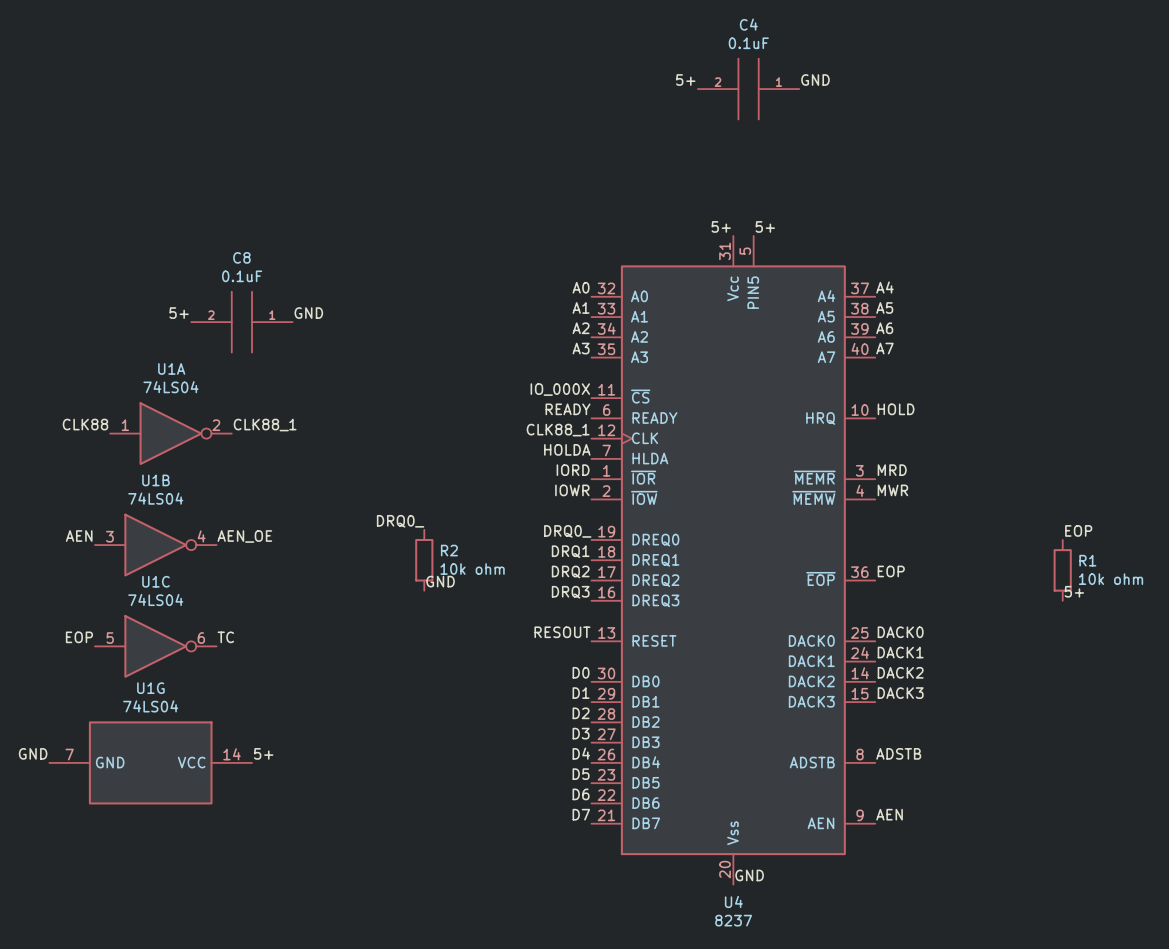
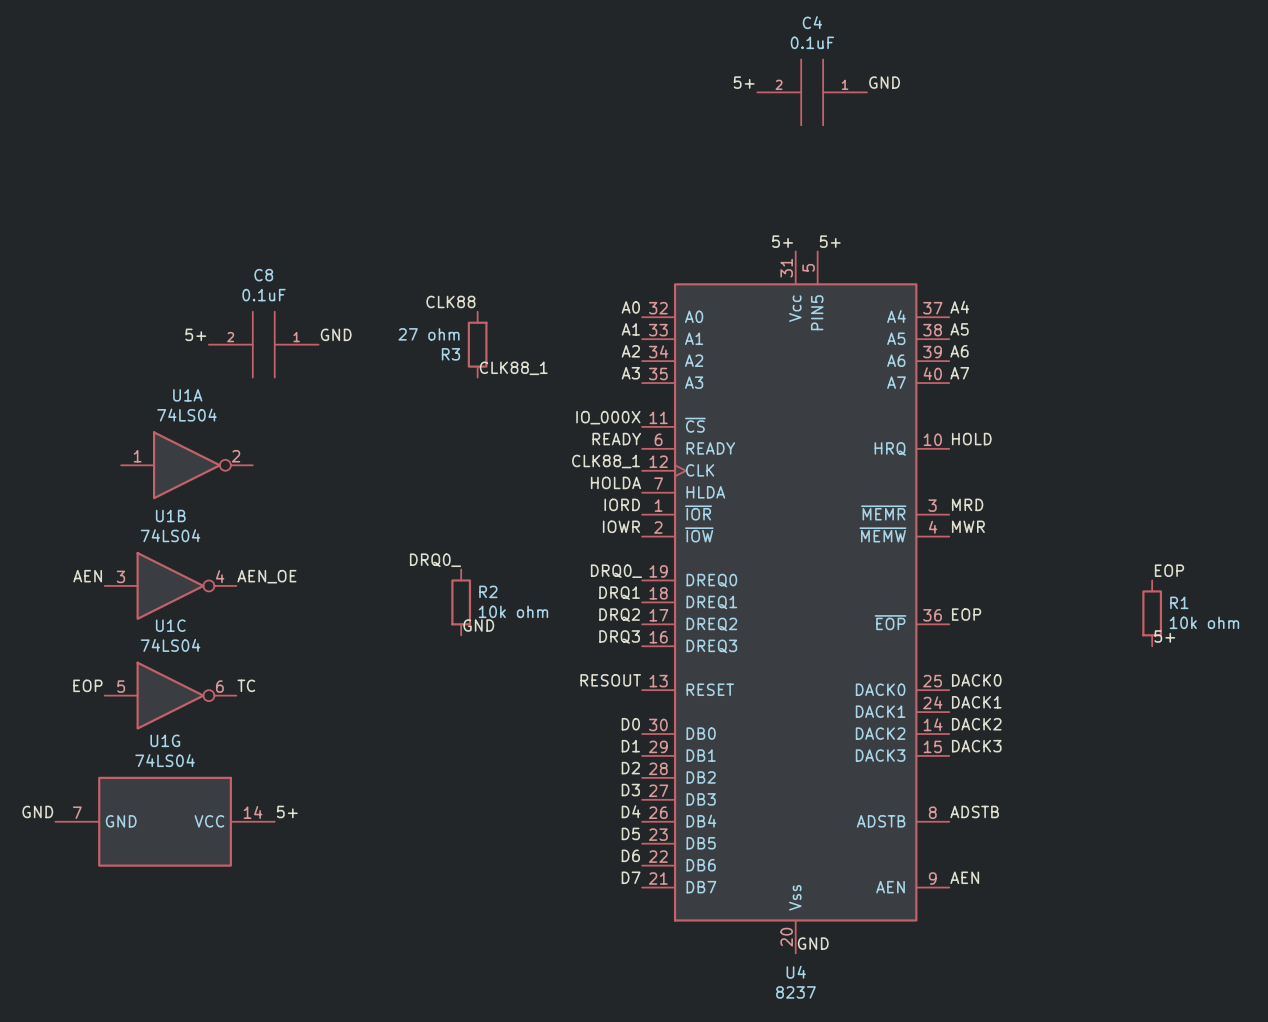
label: none -> CLK88 (450, 301)
R3: none -> 27 ohm (477, 344)
label: none -> CLK88_1 (513, 368)
label: CLK88 (85, 424) -> none
label: CLK88_1 (265, 425) -> none

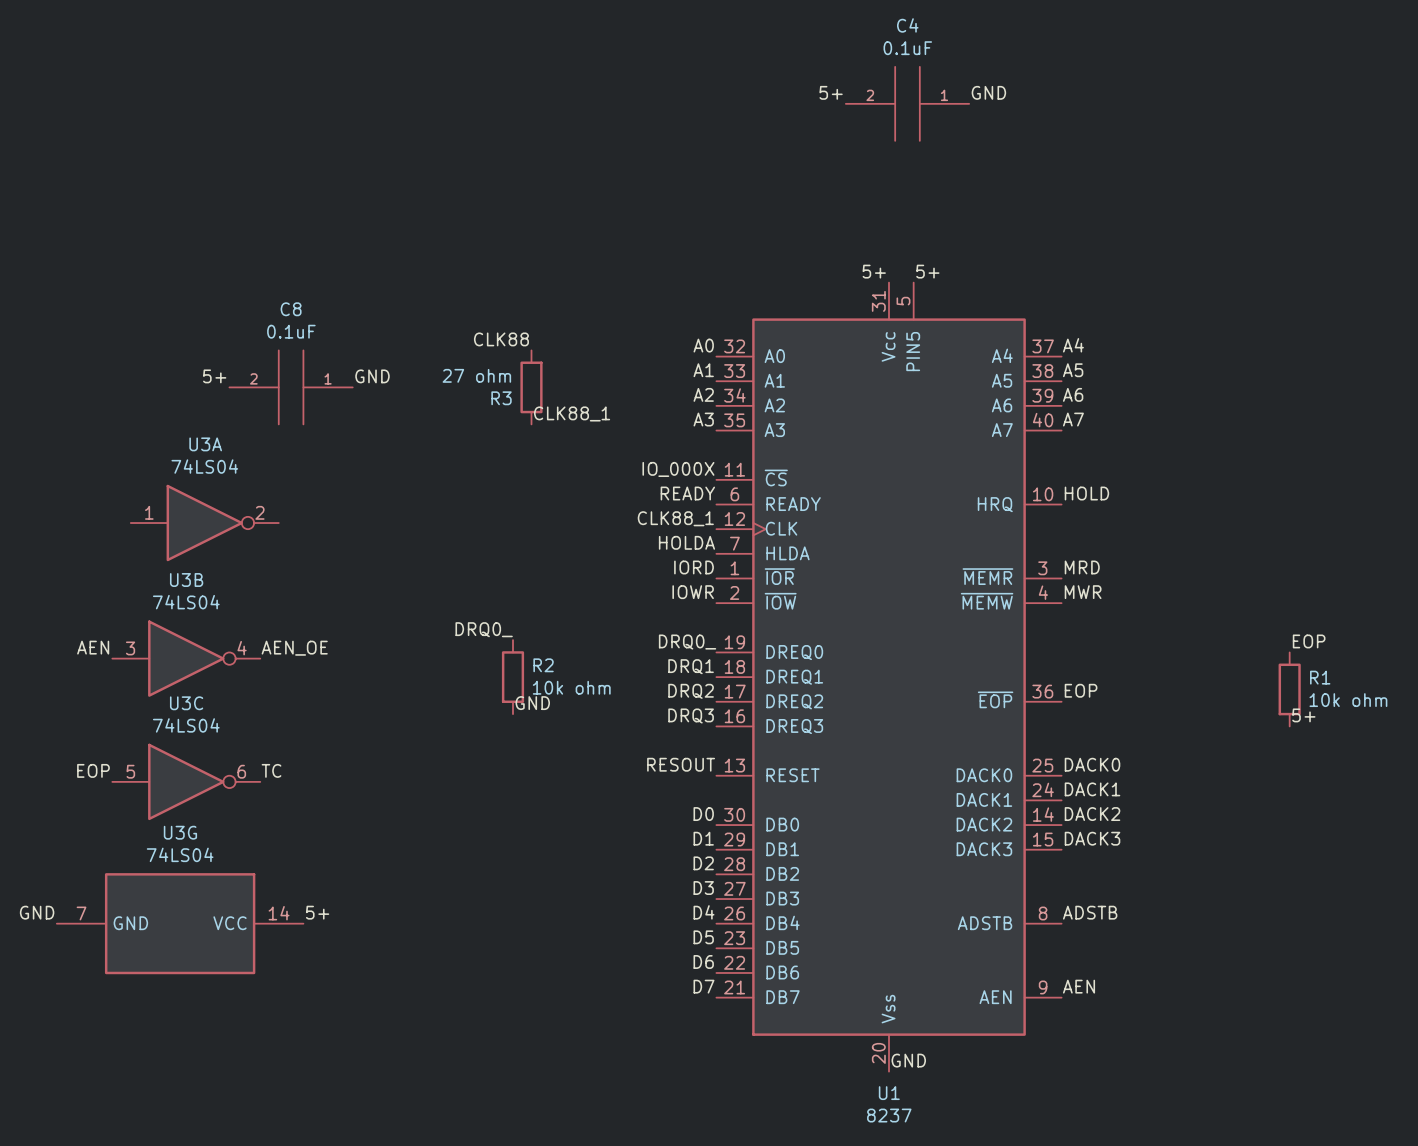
U1A name: U1A (187, 395) -> U3A (205, 444)
U1B name: U1B (170, 516) -> U3B (186, 580)
U1C name: U1C (170, 625) -> U3C (186, 703)
U1G name: U1G (165, 740) -> U3G (180, 832)
U4 name: U4 (796, 972) -> U1 (889, 1093)

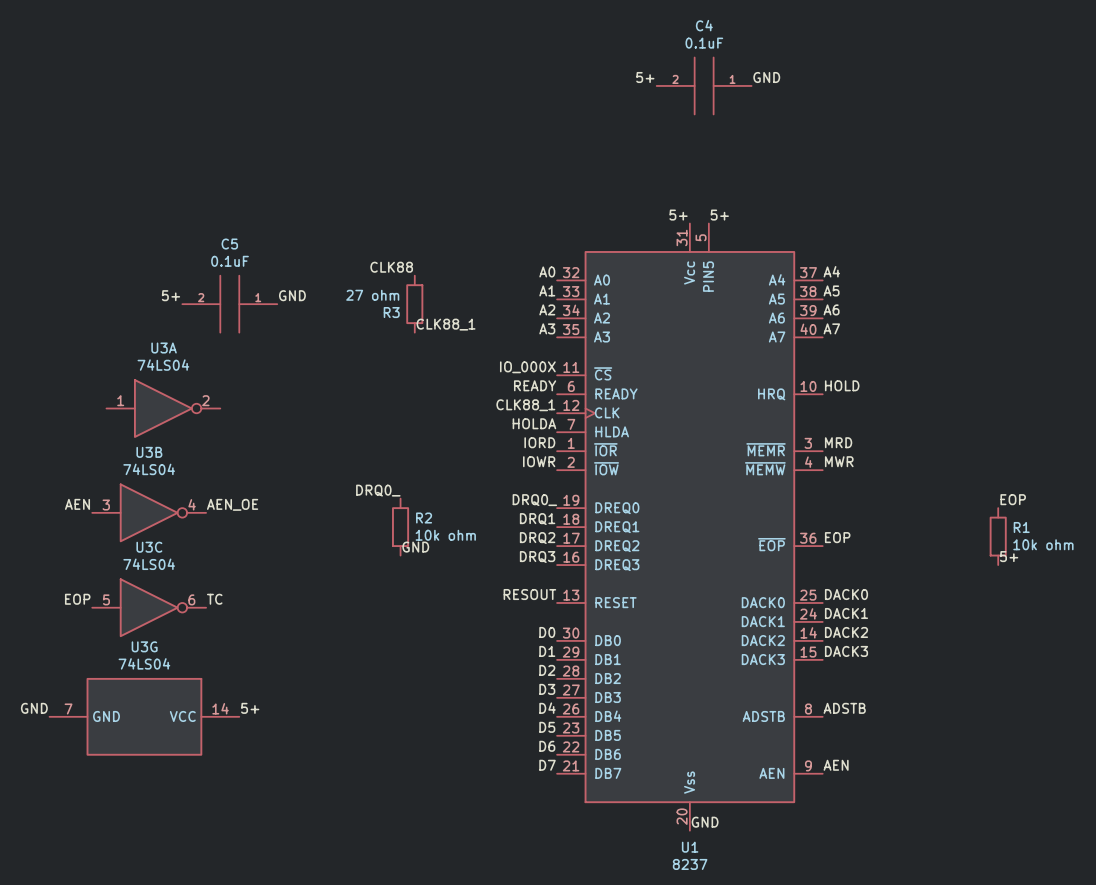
C8 name: C8 (291, 309) -> C5 (229, 244)

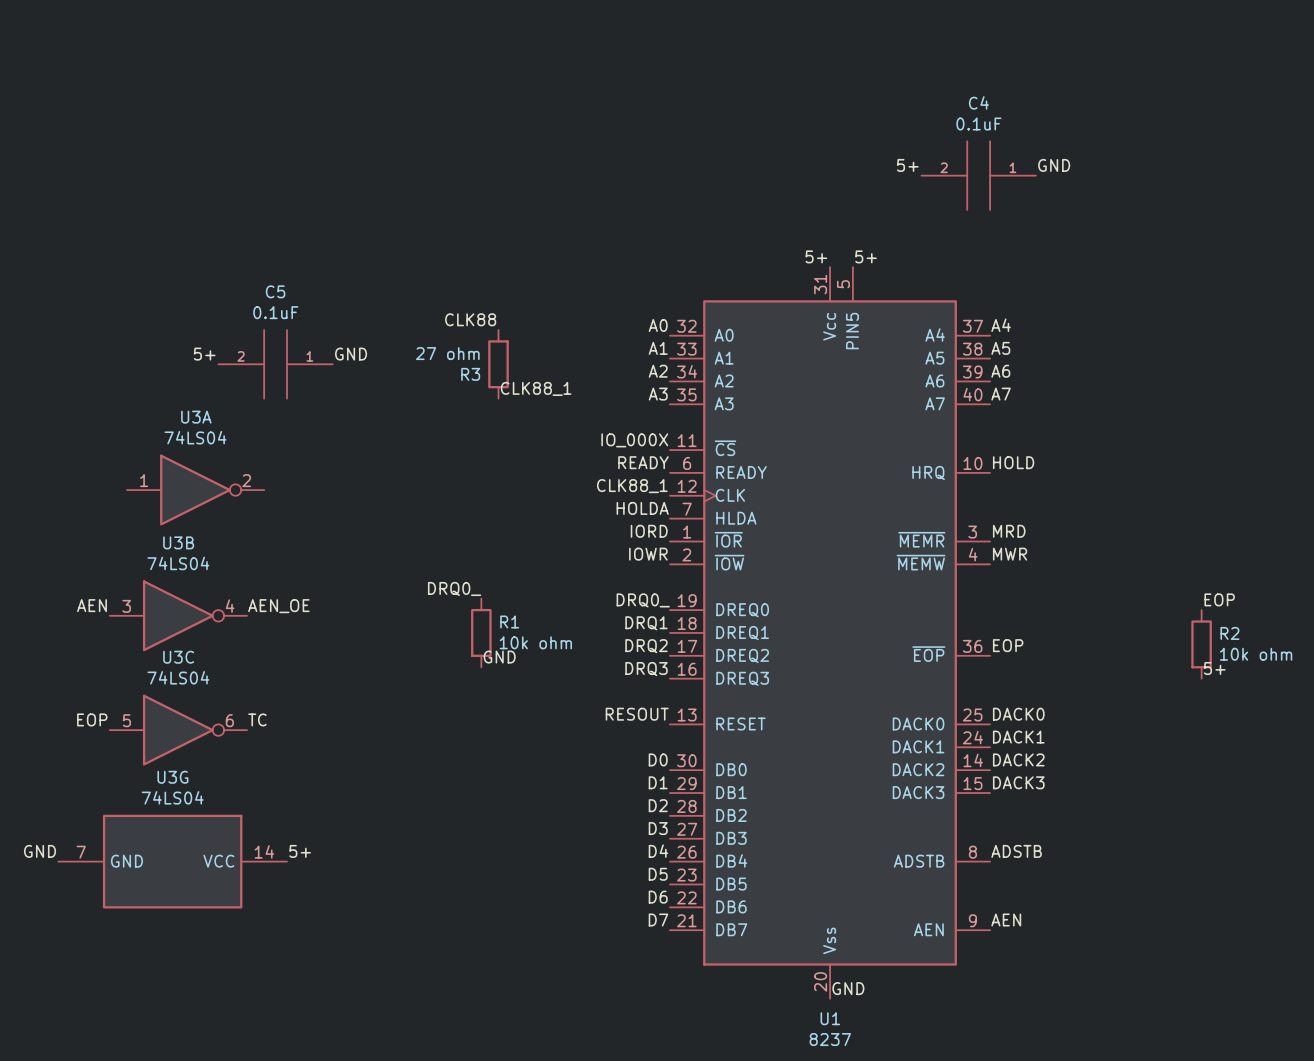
label position: 5+ (645, 77) -> 5+ (907, 165)
label position: GND (766, 77) -> GND (1054, 165)
C4 position: (704, 85) -> (978, 175)
R2 name: R2 (424, 518) -> R1 (509, 622)
R1 name: R1 (1021, 527) -> R2 (1229, 633)

